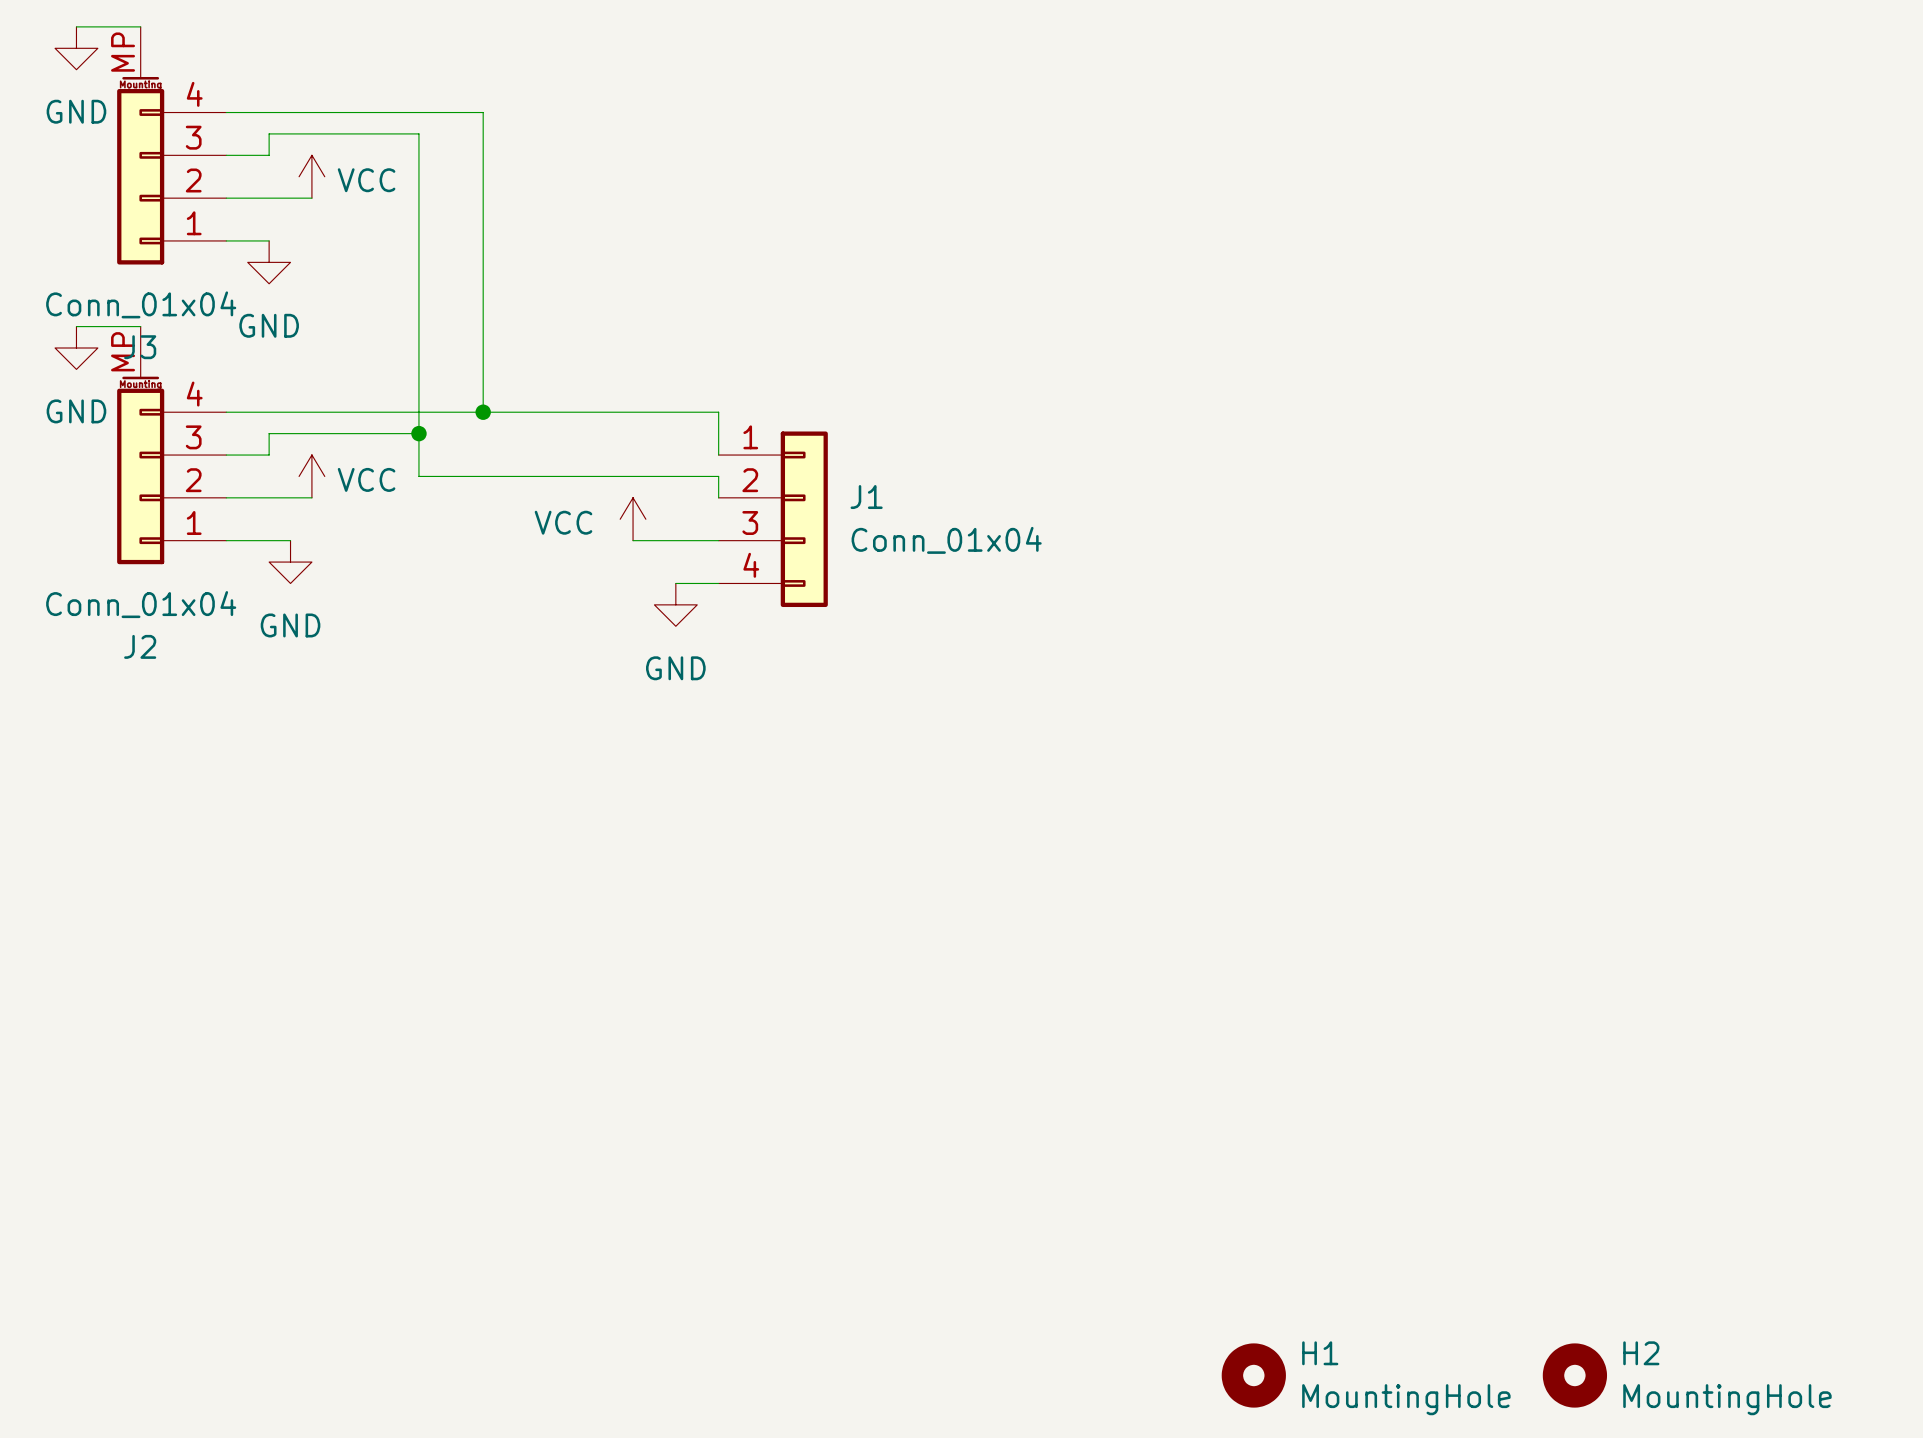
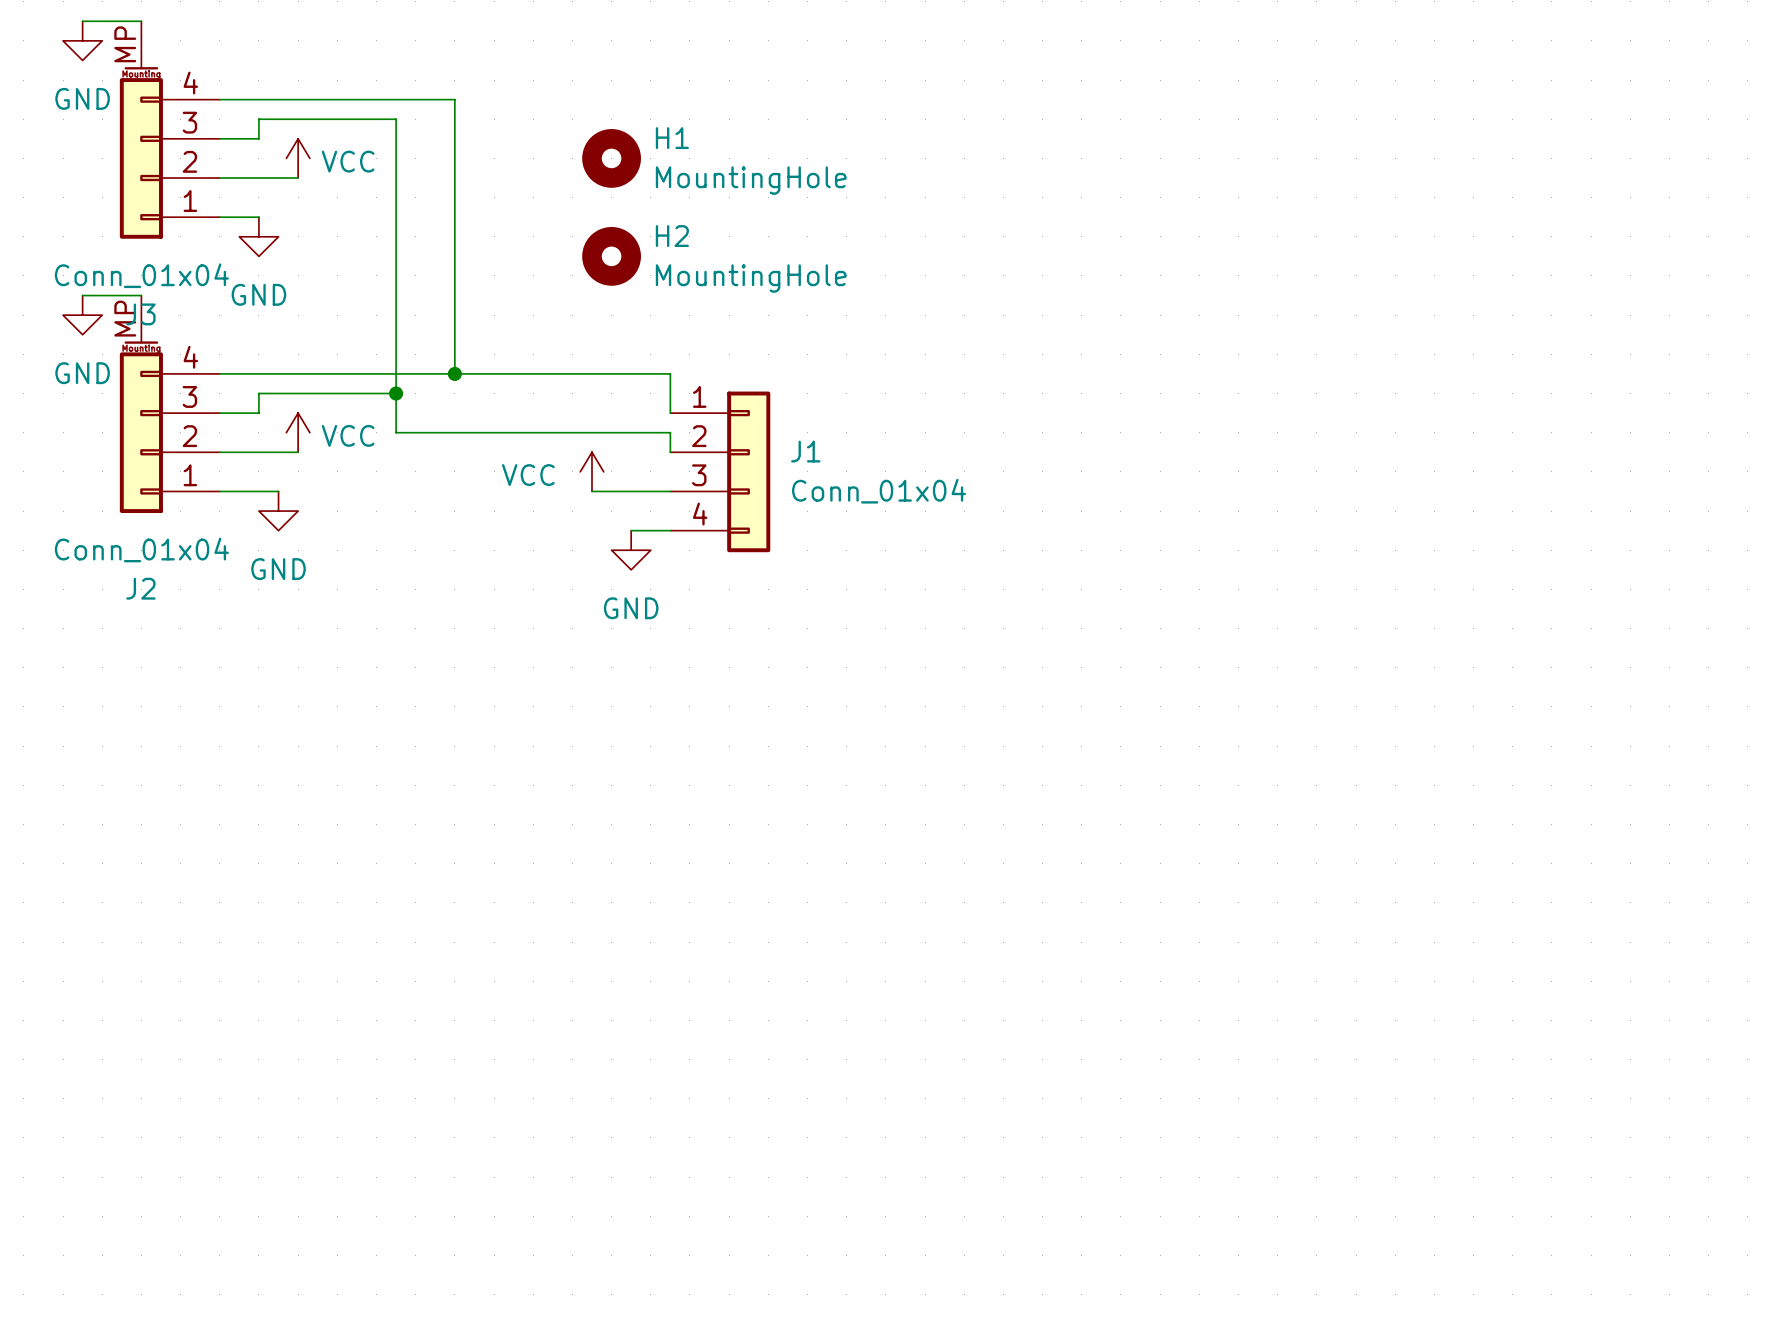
H1 position: (1253, 1375) -> (611, 158)
H2 position: (1574, 1375) -> (611, 256)

